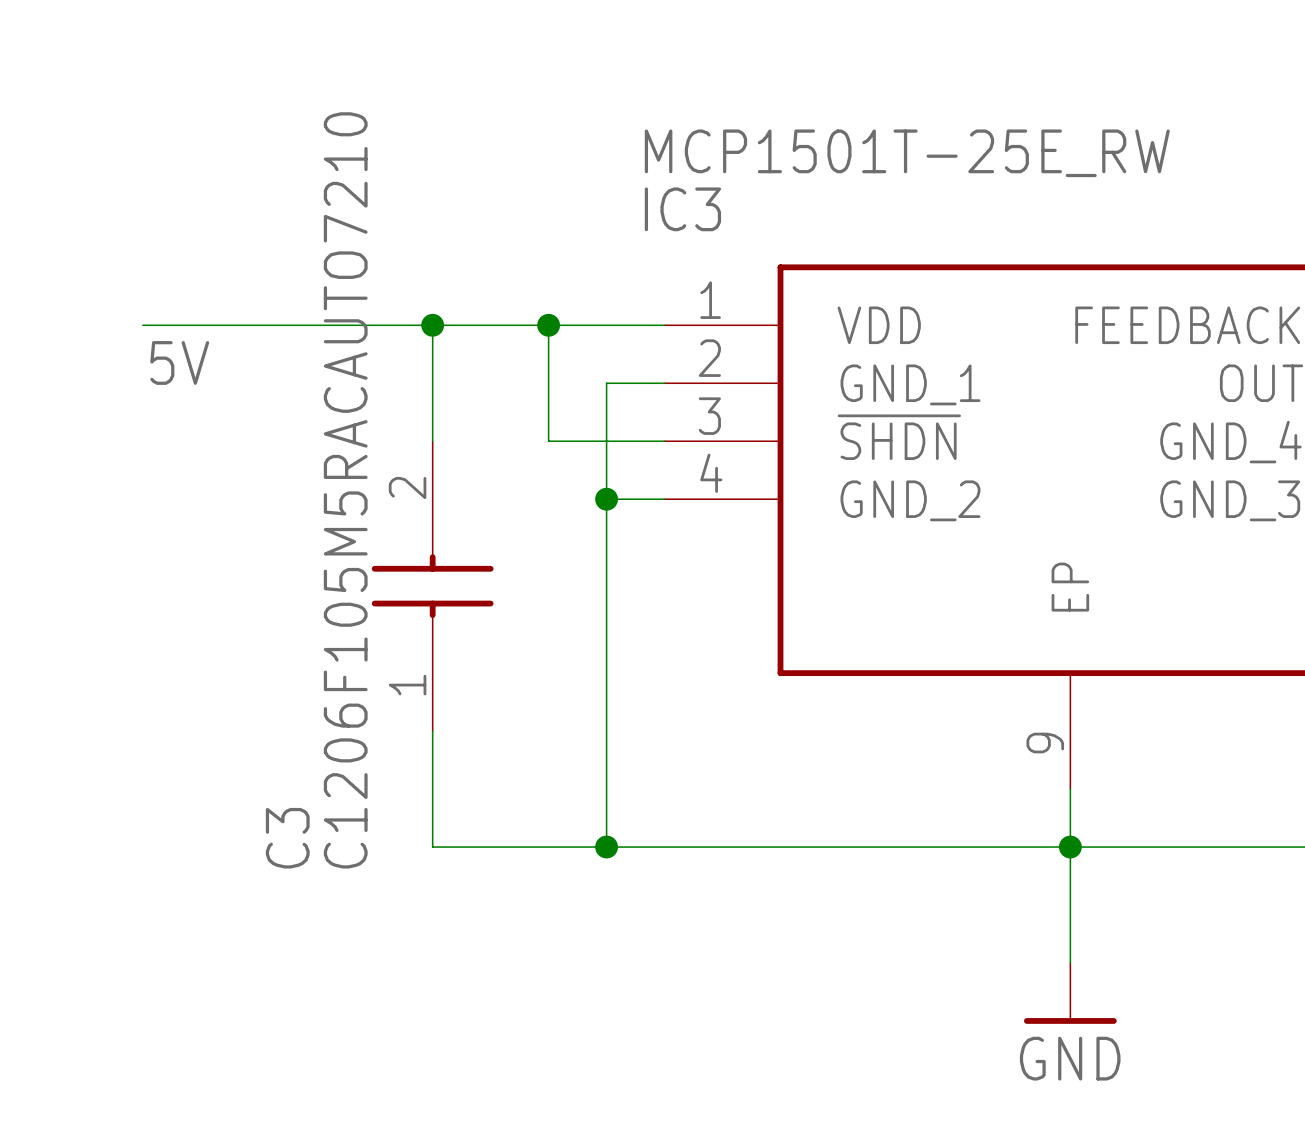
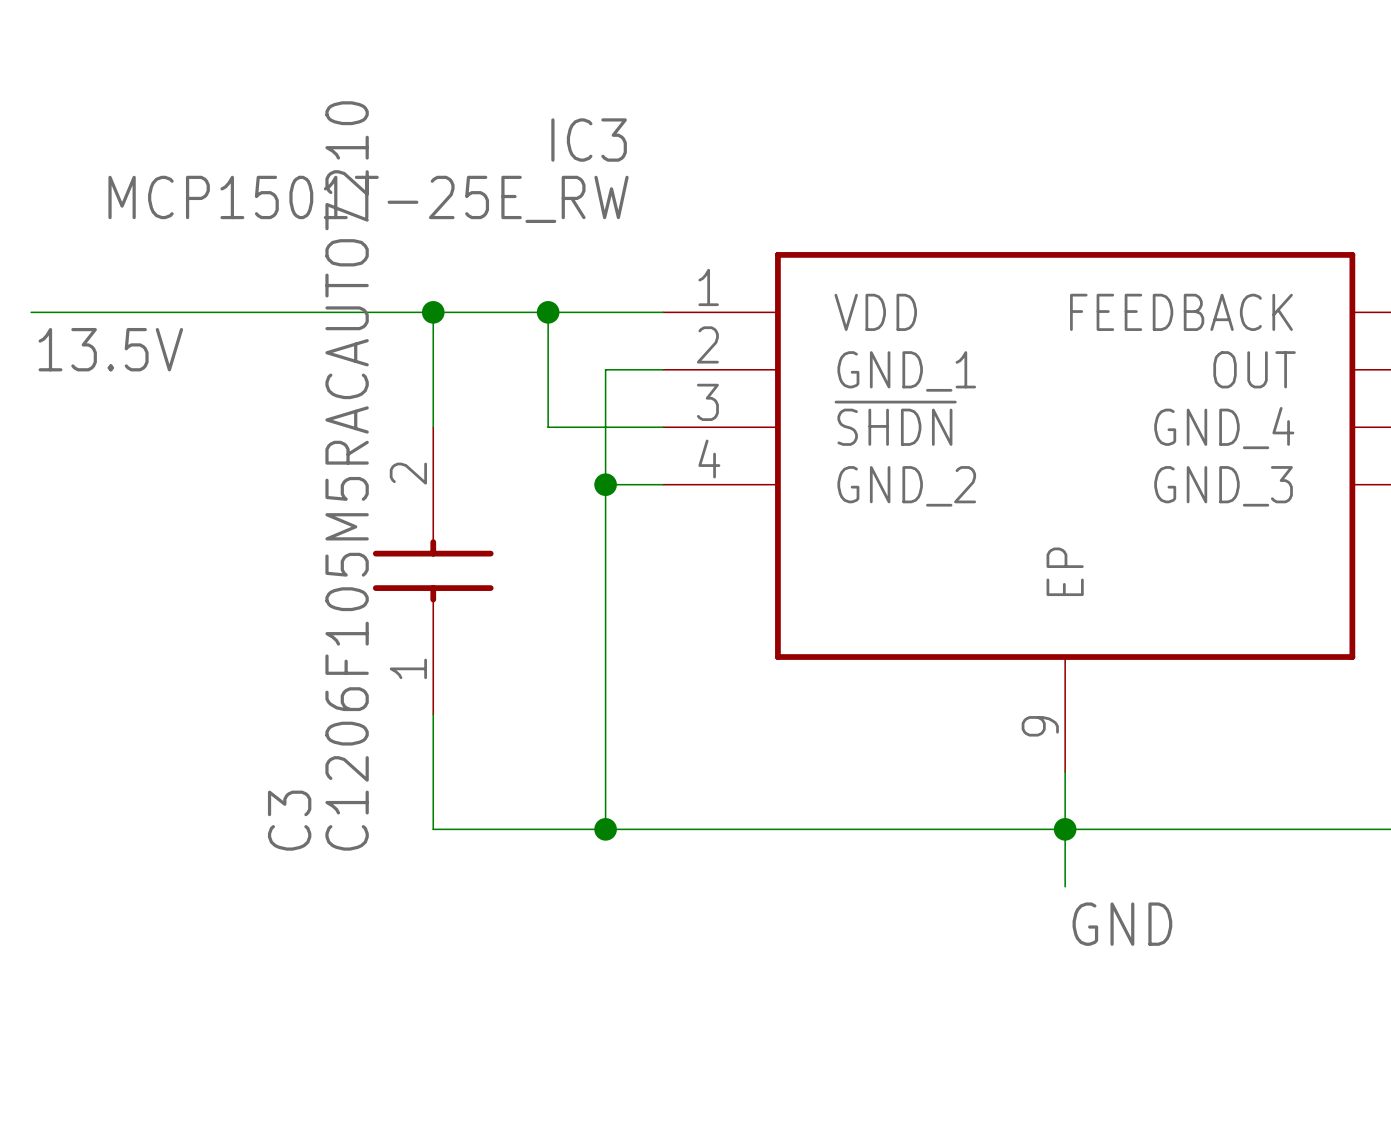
IC3 value position: MCP1501T-25E_RW (907, 153) -> MCP1501T-25E_RW (368, 199)
IC3 name position: IC3 (682, 209) -> IC3 (589, 140)
wire: none -> (31, 312) (146, 312)
label: none -> 13.5V (110, 349)
label: 5V (179, 362) -> none
wire: (1070, 905) (1070, 962) -> none
label: none -> GND (1122, 924)
power symbol: GND (1070, 993) -> none

